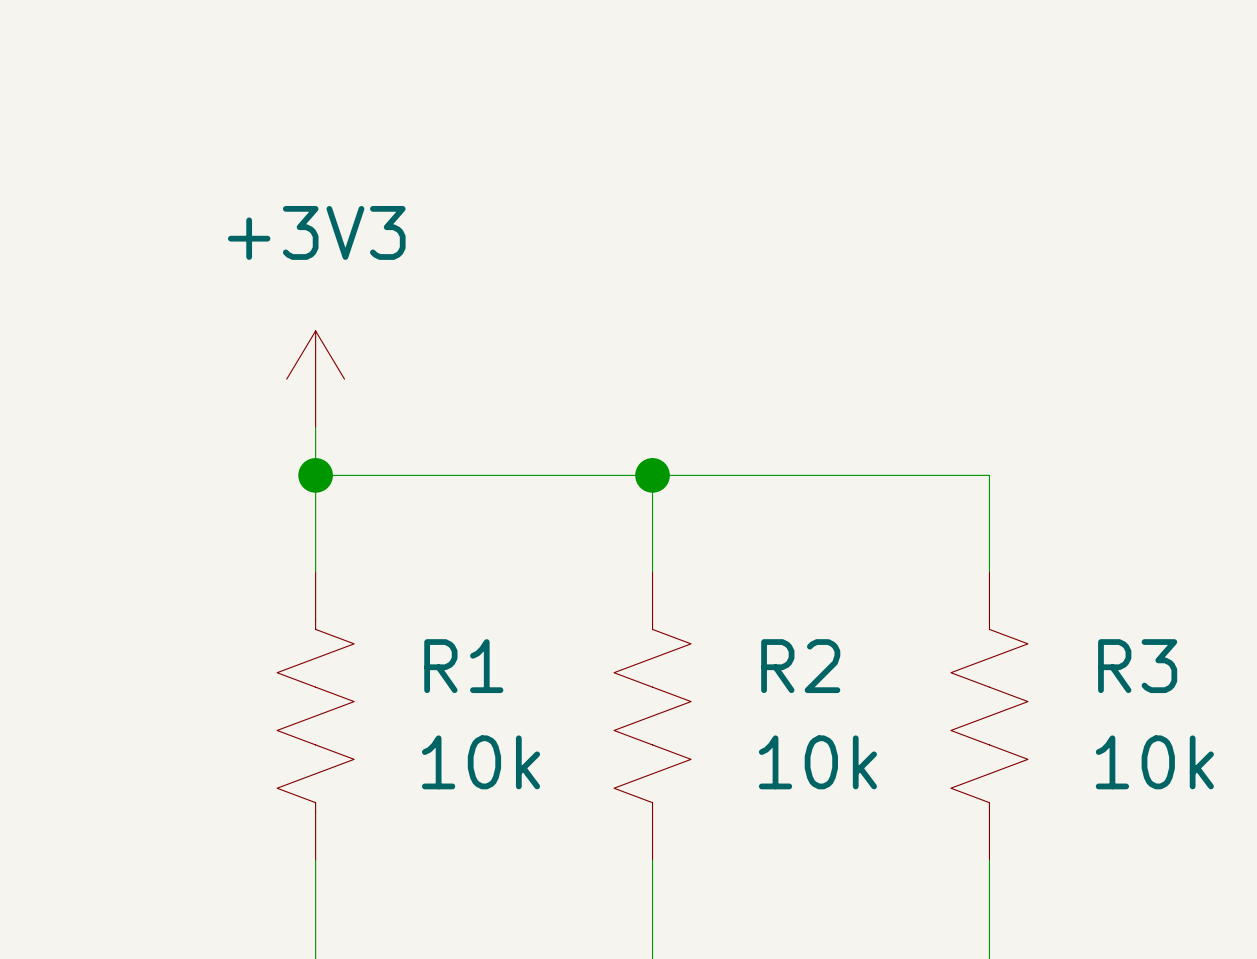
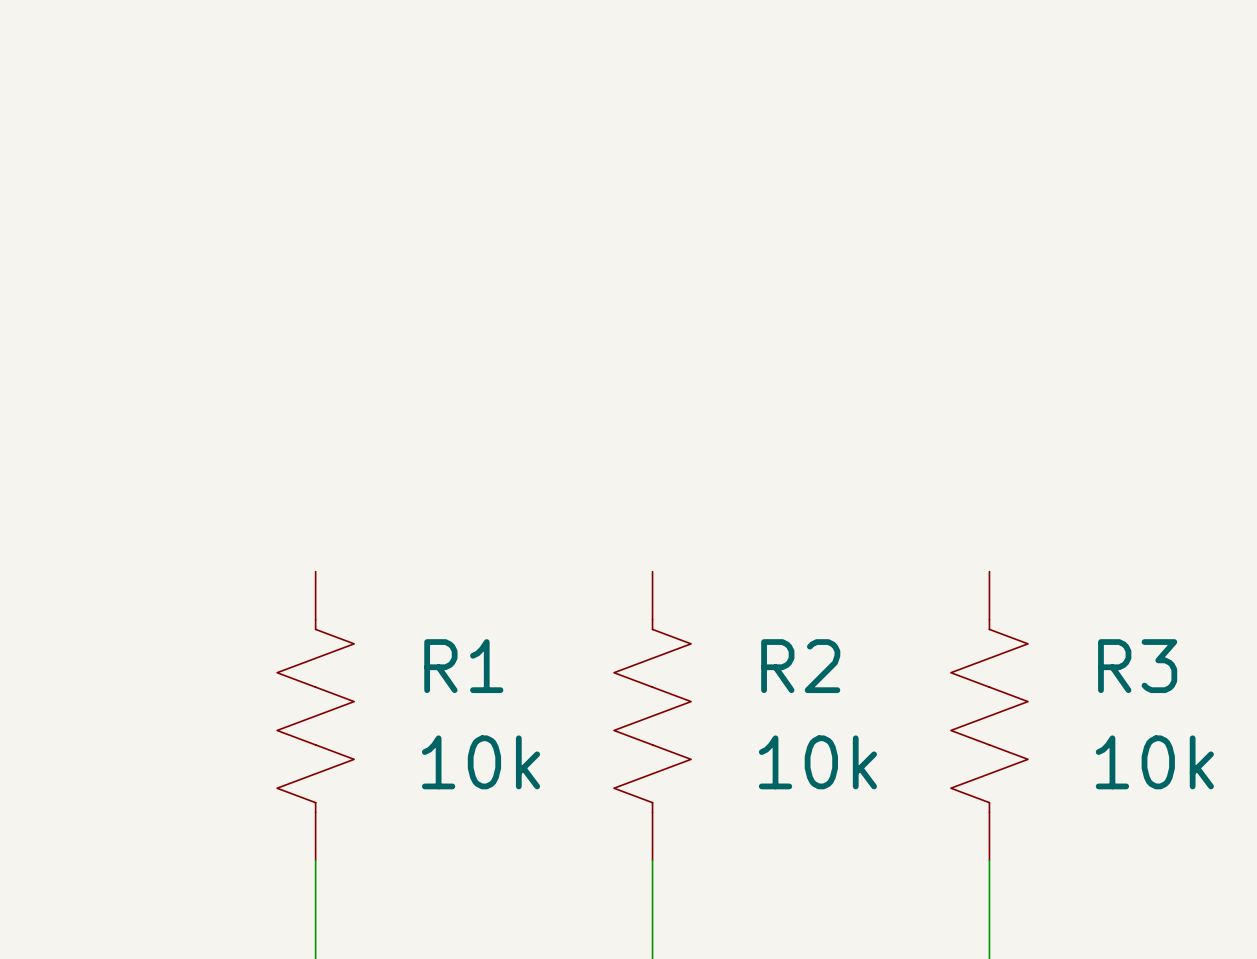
power symbol: +3V3 (315, 379) -> none
wire: (315, 427) (315, 571) -> none
wire: (315, 475) (989, 475) (989, 571) -> none
junction: (315, 475) -> none
wire: (652, 475) (652, 571) -> none
junction: (652, 475) -> none

